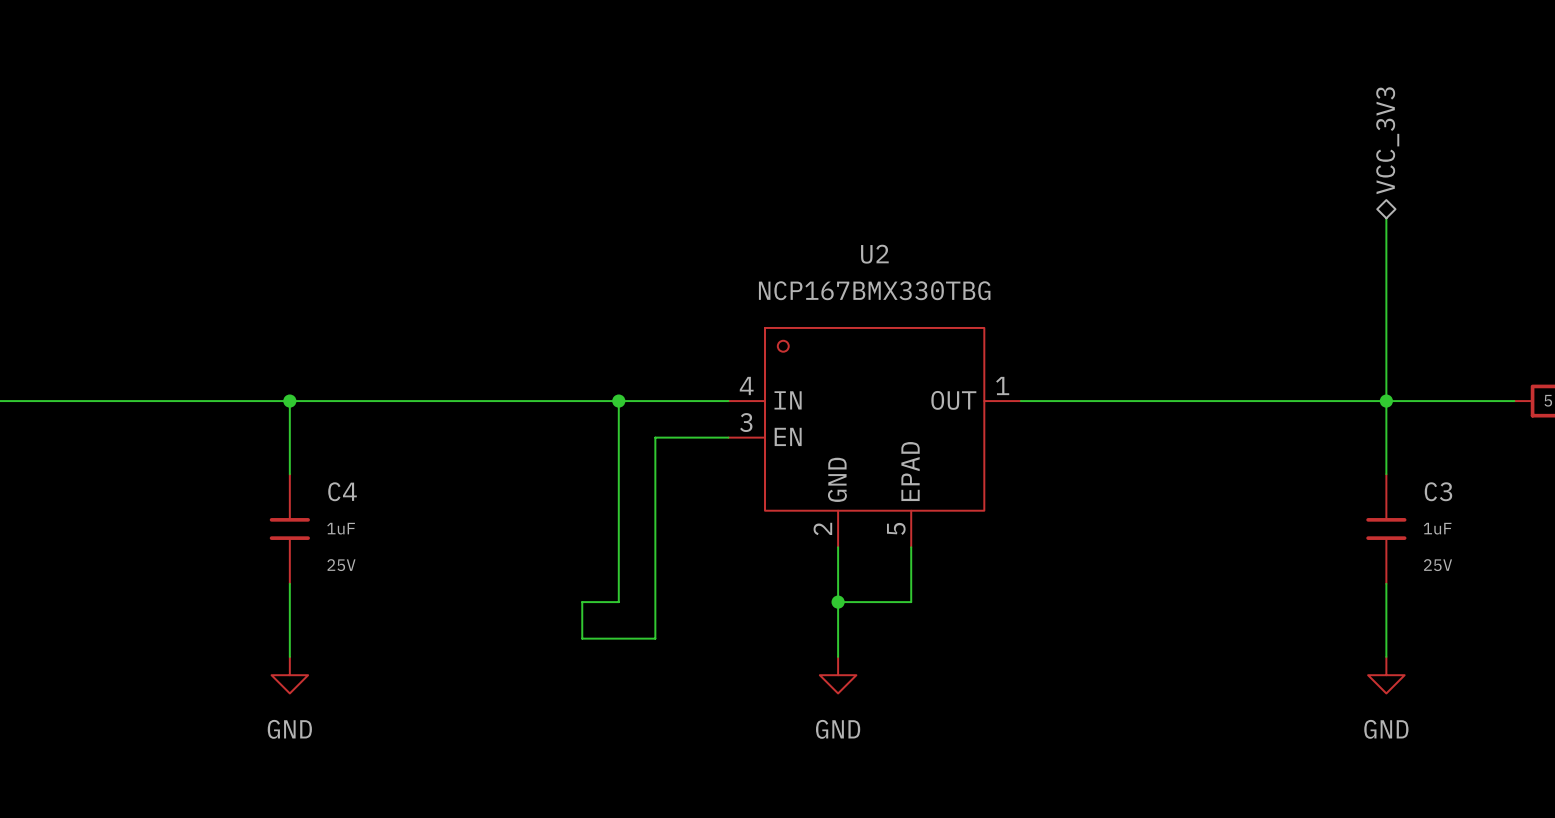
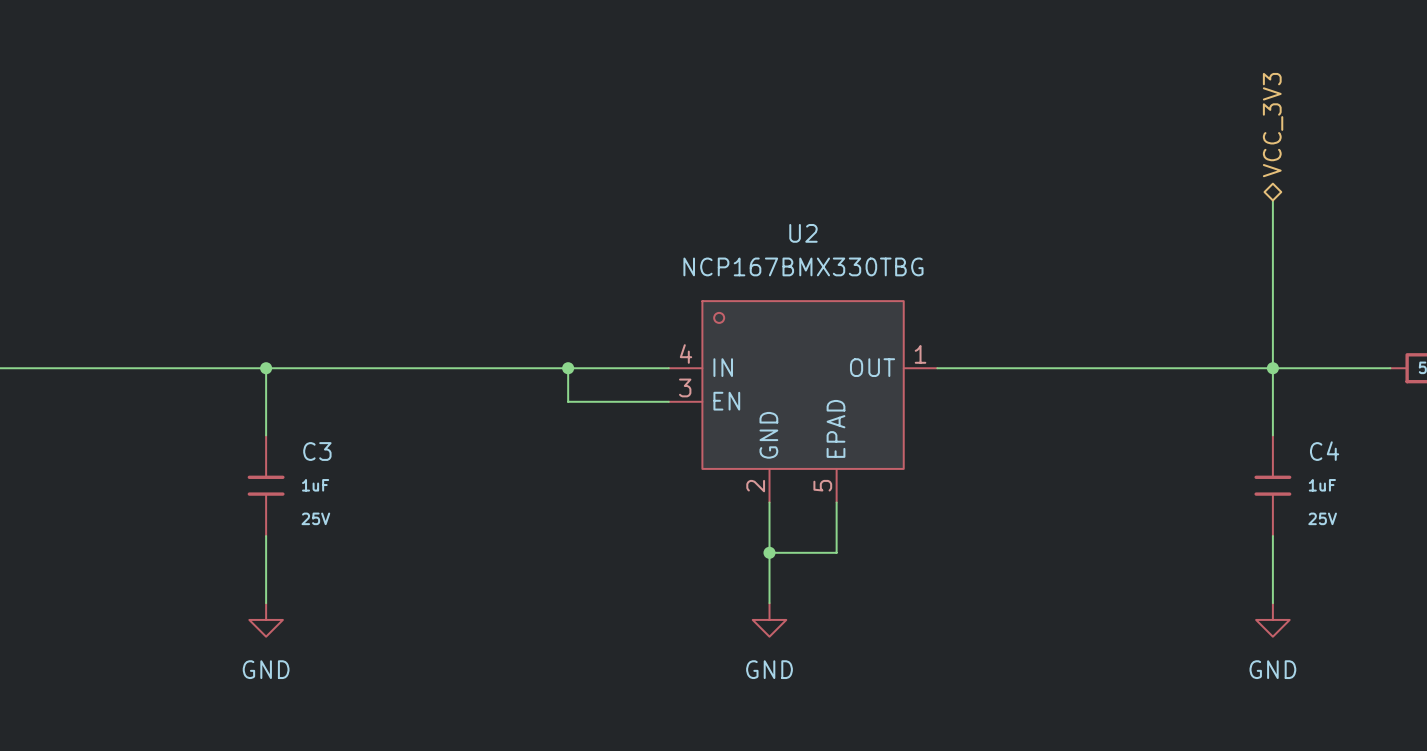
wire: (618, 437) (618, 602) (582, 602) (582, 638) (655, 638) (655, 437) -> (568, 401) (601, 401)
C4 name: C4 (342, 491) -> C3 (317, 451)
C3 name: C3 (1438, 491) -> C4 (1324, 451)

